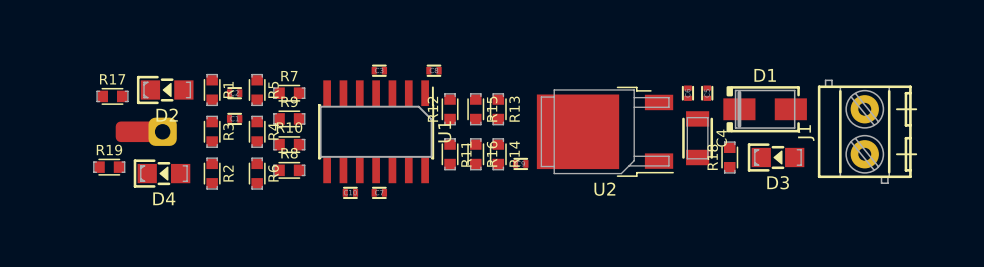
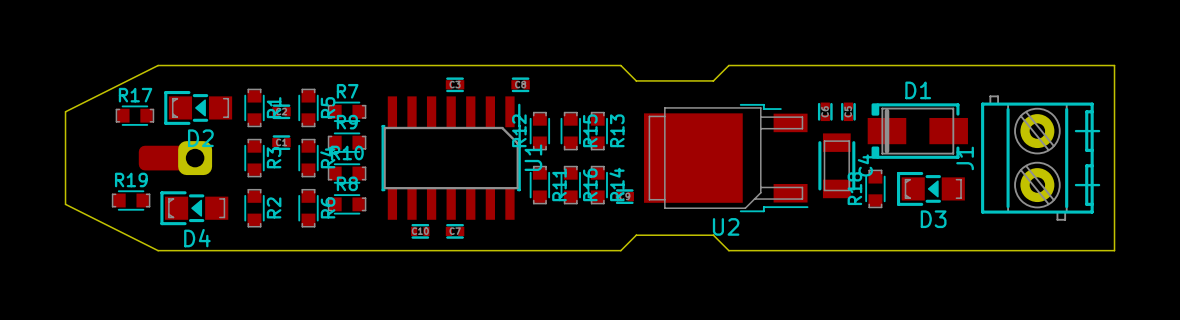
board edge: none -> (158, 65) (620, 65) (636, 80) (713, 80) (728, 65) (1114, 65) (1114, 250) (728, 250) (713, 235) (636, 235) (620, 250) (158, 250) (65, 204) (65, 111) (158, 65)

